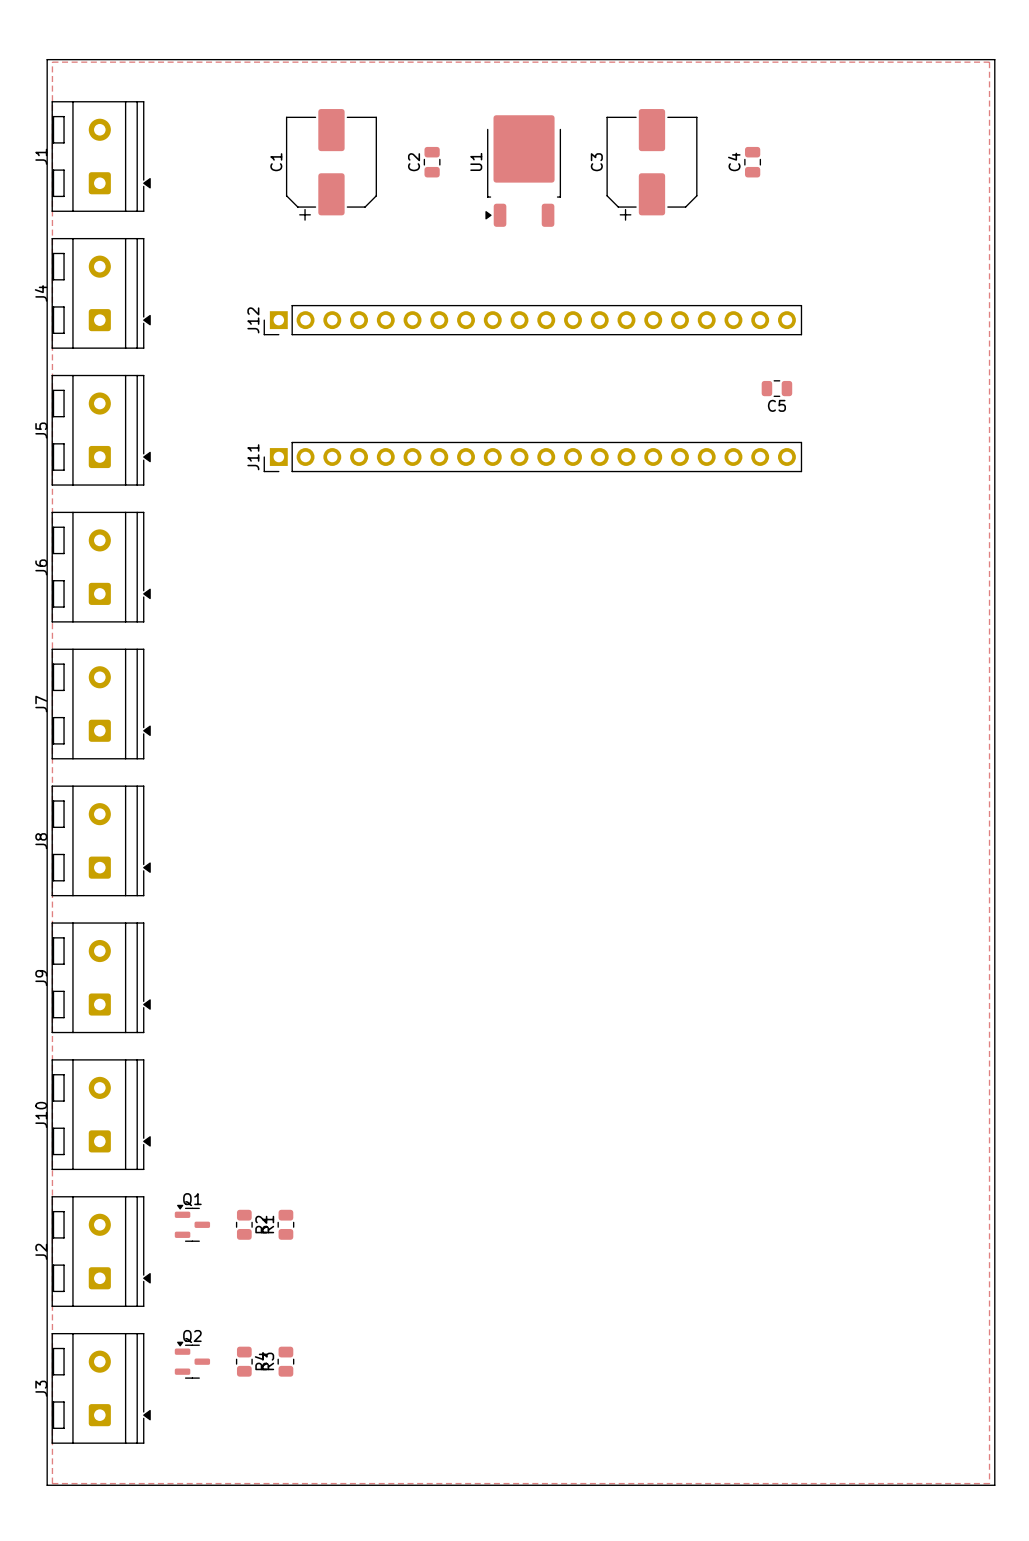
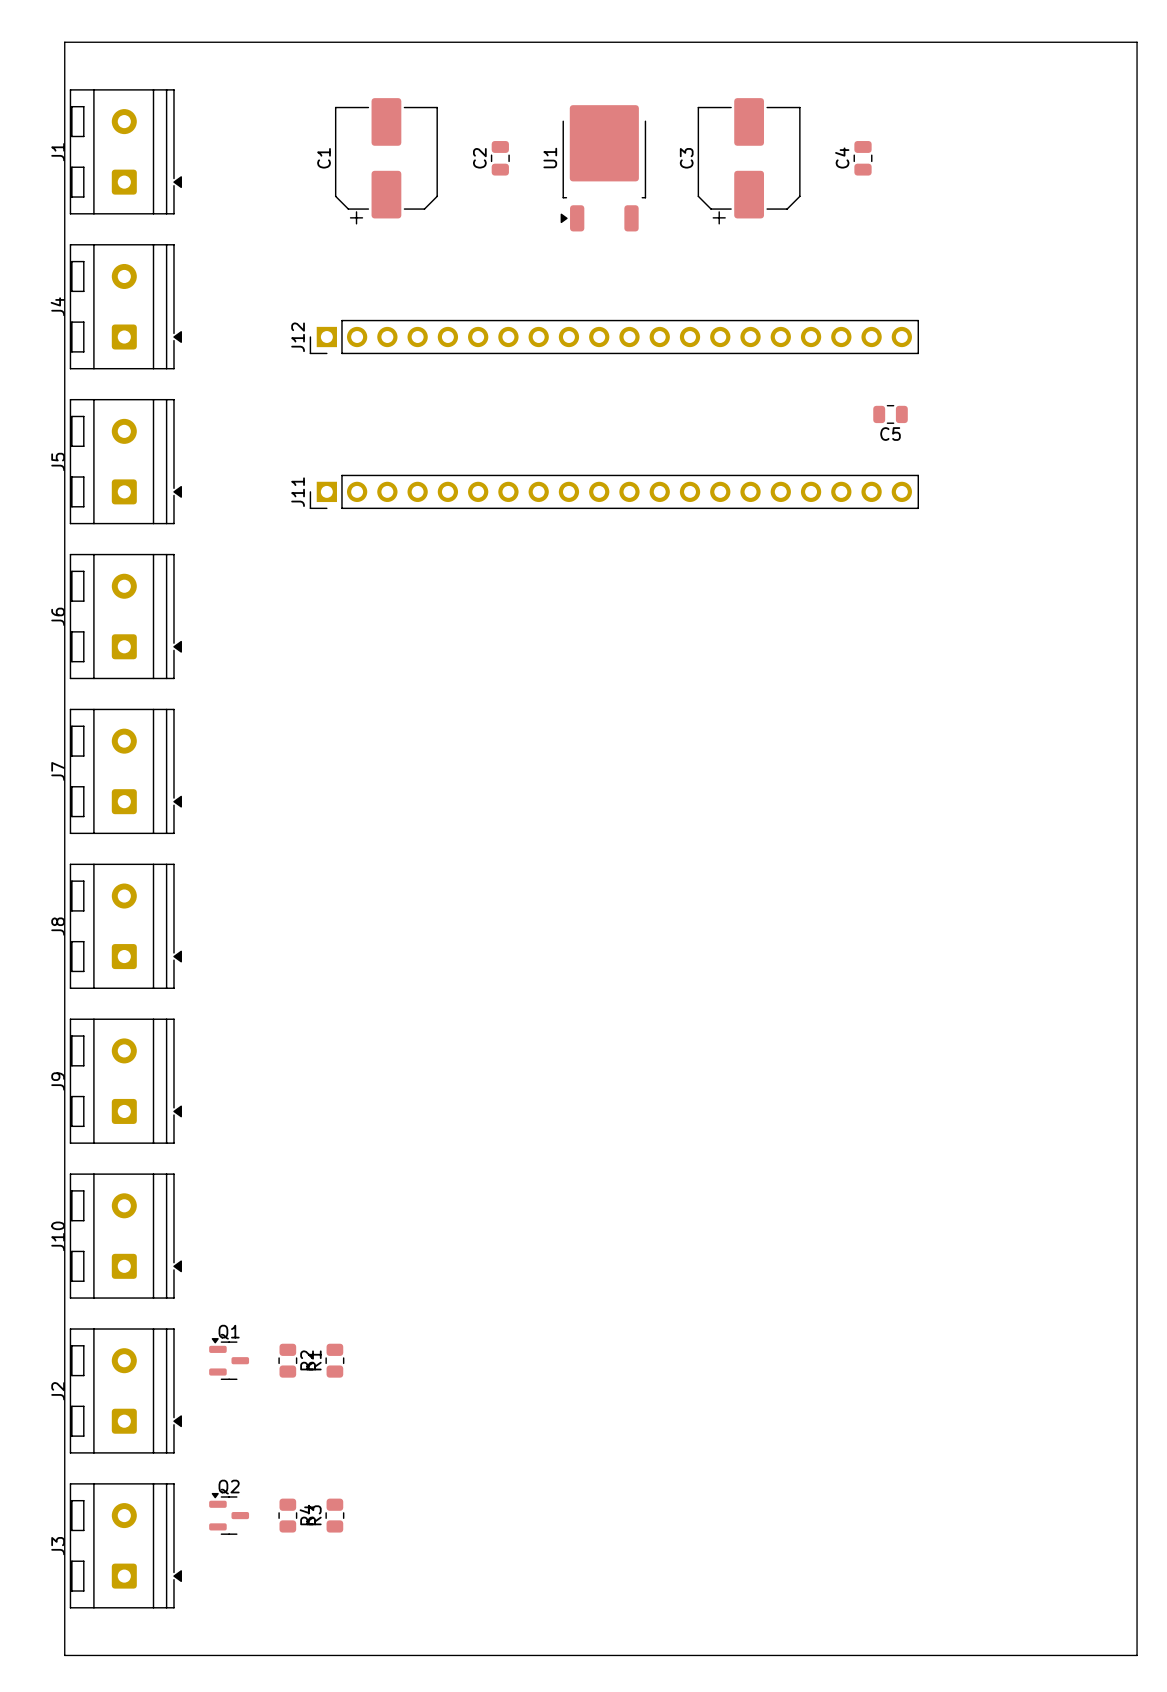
zone outline: (52, 62) (989, 62) (989, 1483) (52, 1483) (52, 62) -> none

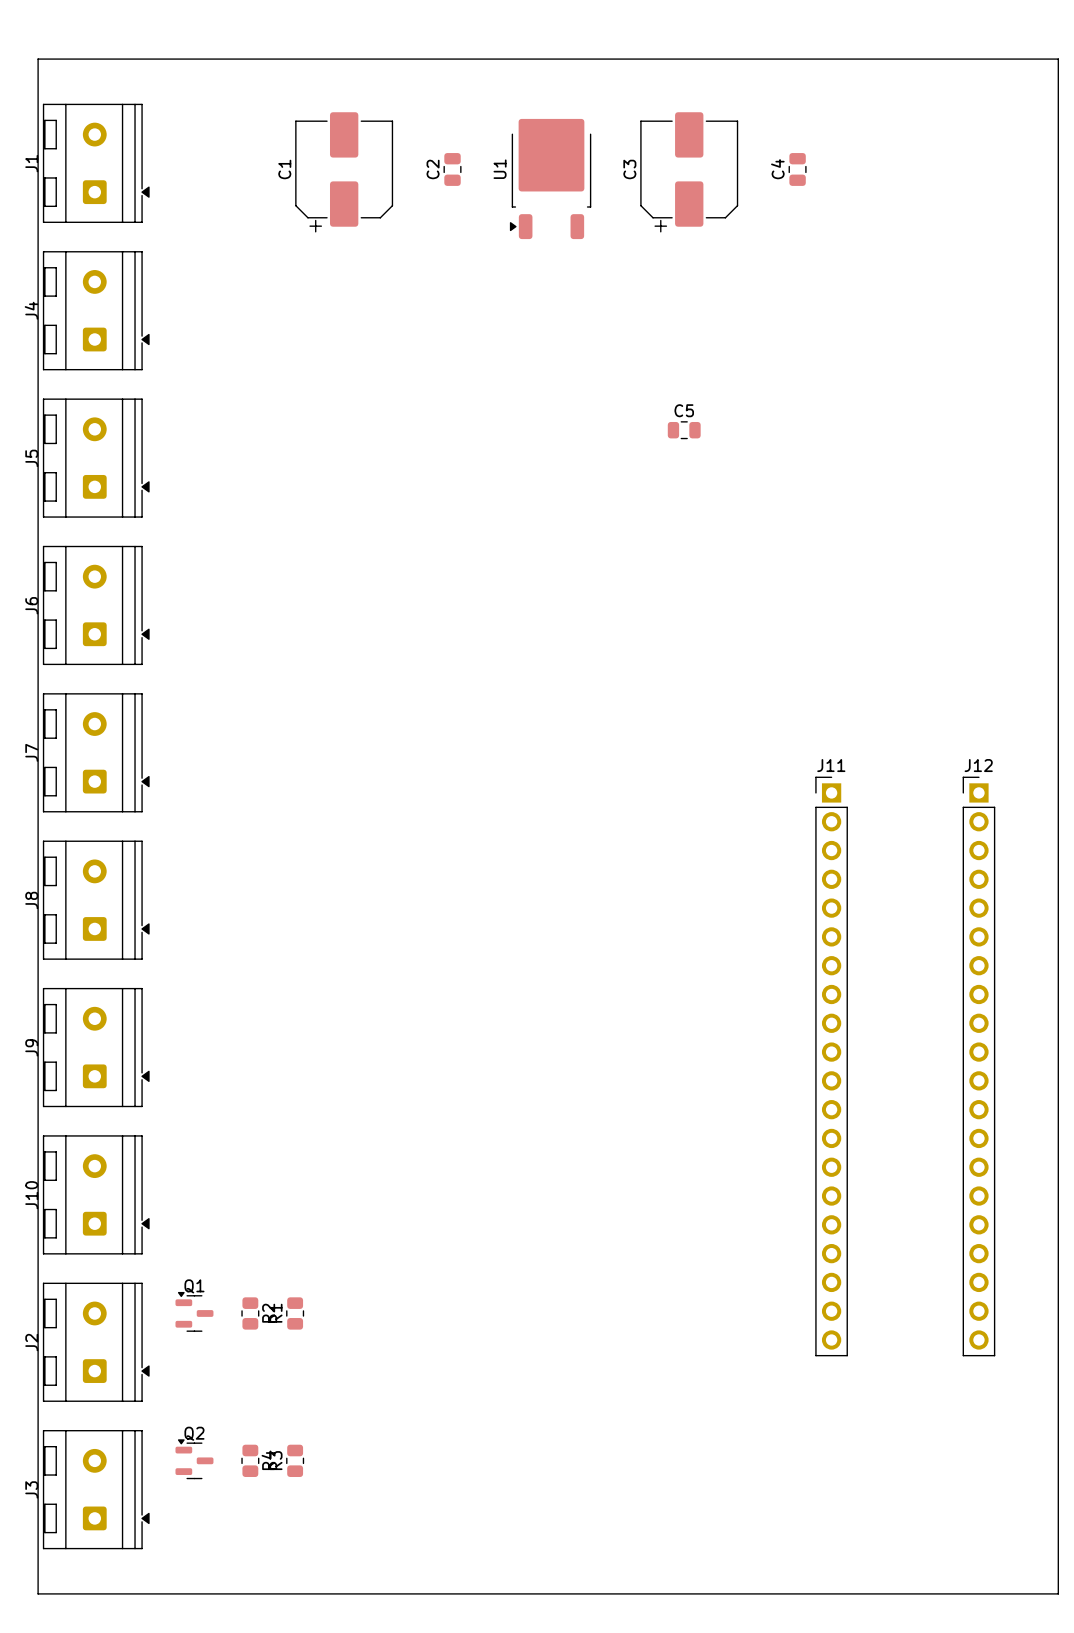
J12 rotation: 0° (614, 337) -> 90° clockwise (978, 1066)
J12 position: (614, 337) -> (978, 1066)
C5 position: (890, 414) -> (684, 430)
C5 name position: C5 (890, 434) -> C5 (684, 410)
J11 rotation: 0° (614, 491) -> 90° clockwise (831, 1066)
J11 position: (614, 491) -> (831, 1066)

